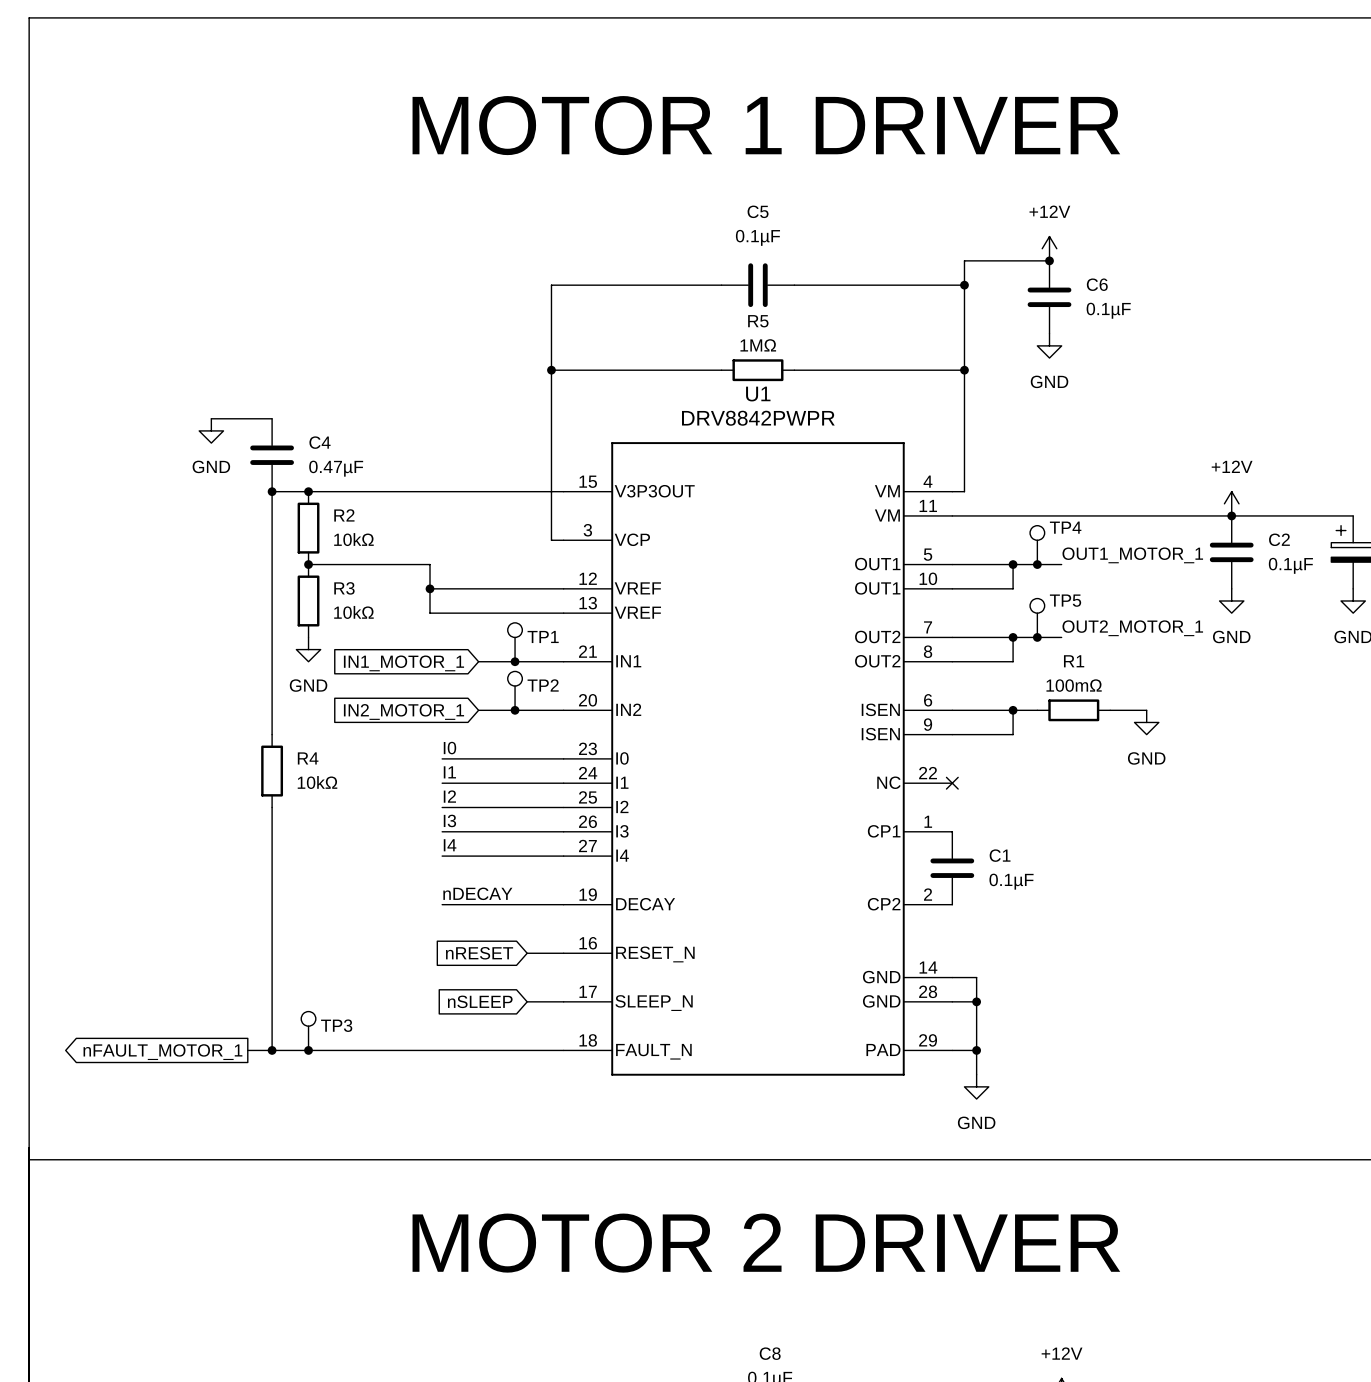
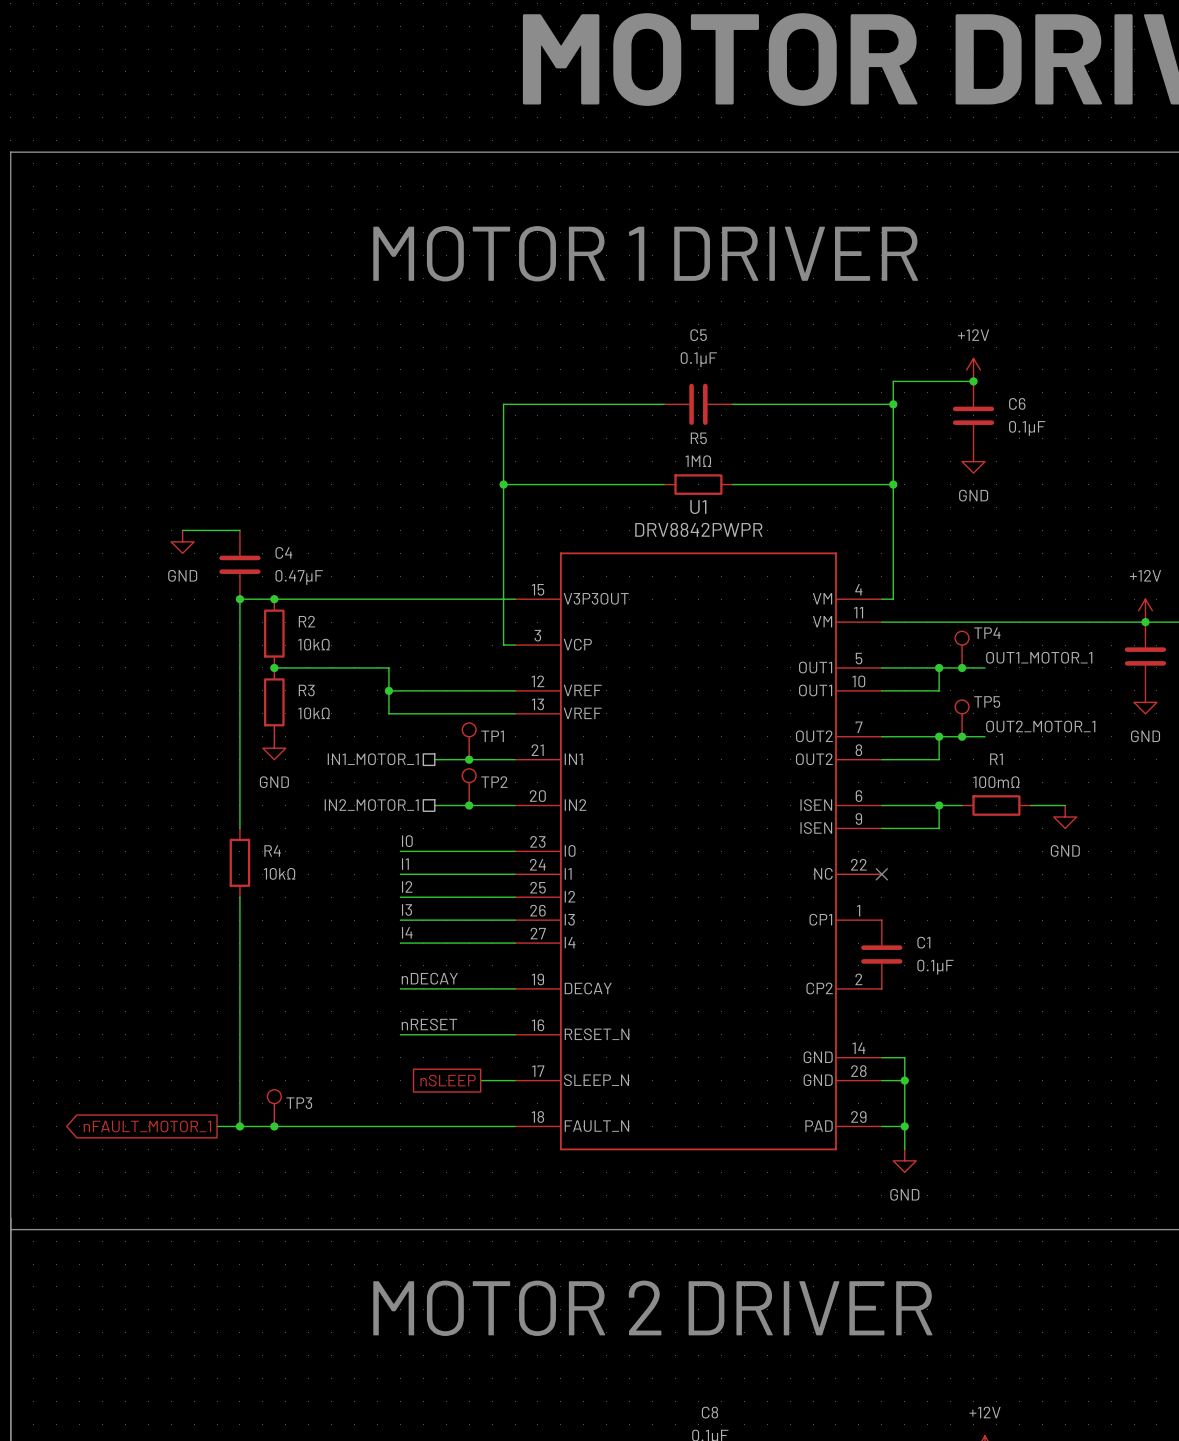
hierarchical label: none -> IN1_MOTOR_1 (373, 759)
global label: IN1_MOTOR_1 (403, 663) -> none
hierarchical label: none -> IN2_MOTOR_1 (371, 805)
global label: IN2_MOTOR_1 (403, 711) -> none
label: none -> nRESET (429, 1024)
wire: none -> (400, 1034) (480, 1034)
global label: nRESET (479, 953) -> none
global label shape: input (480, 1001) -> passive (448, 1080)

